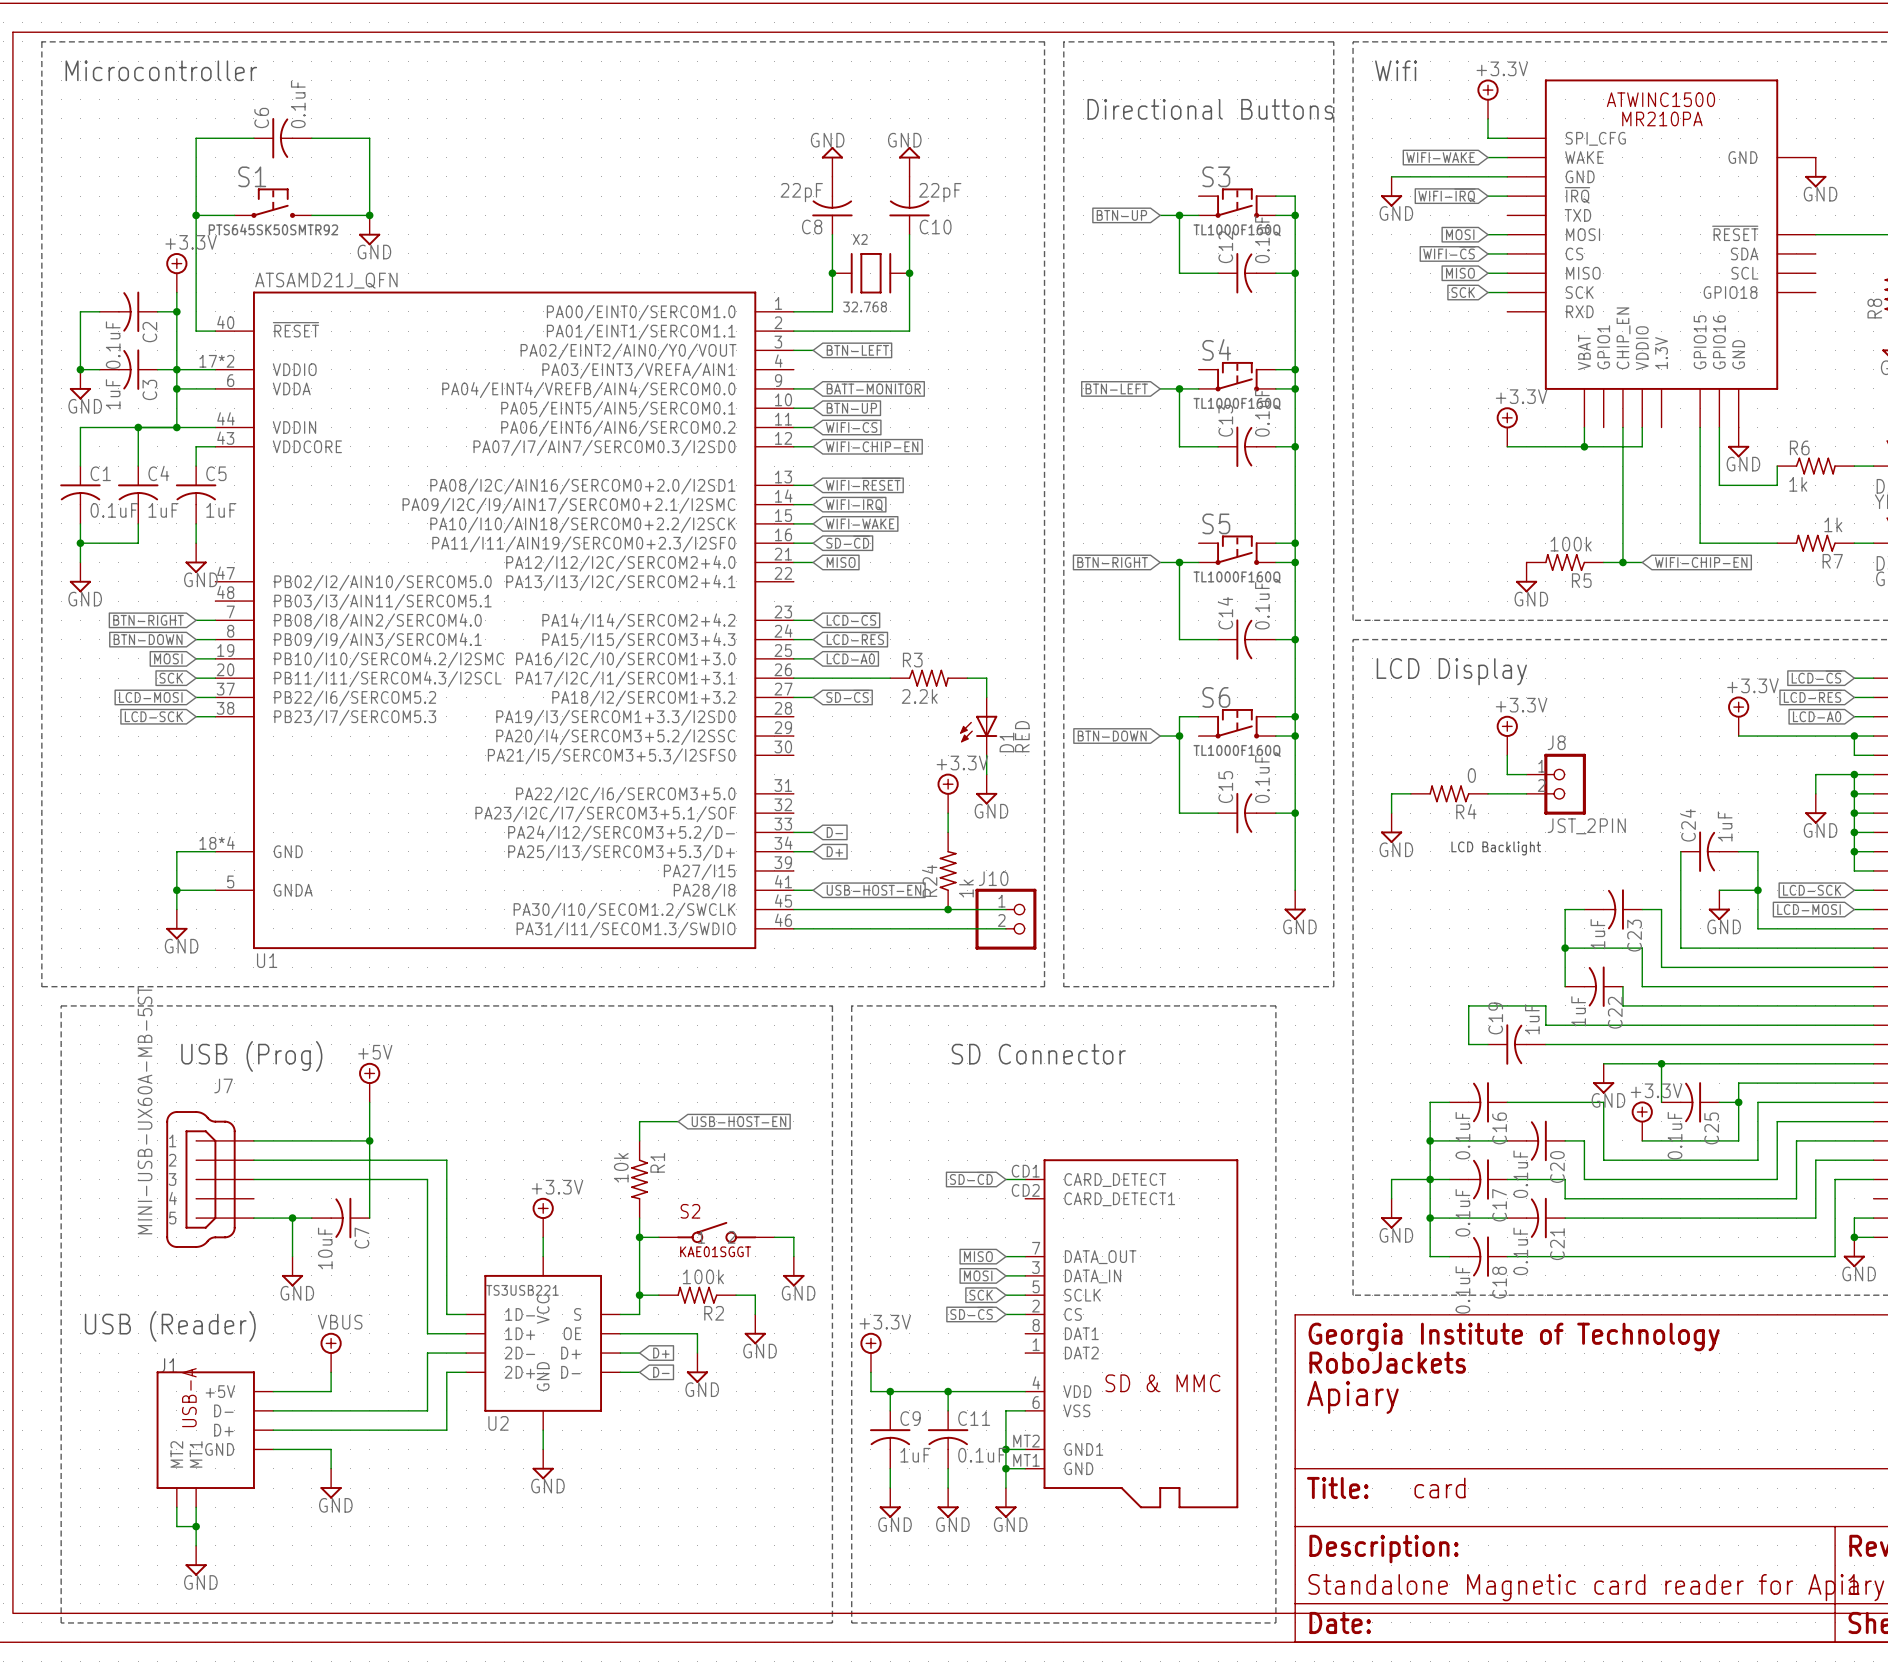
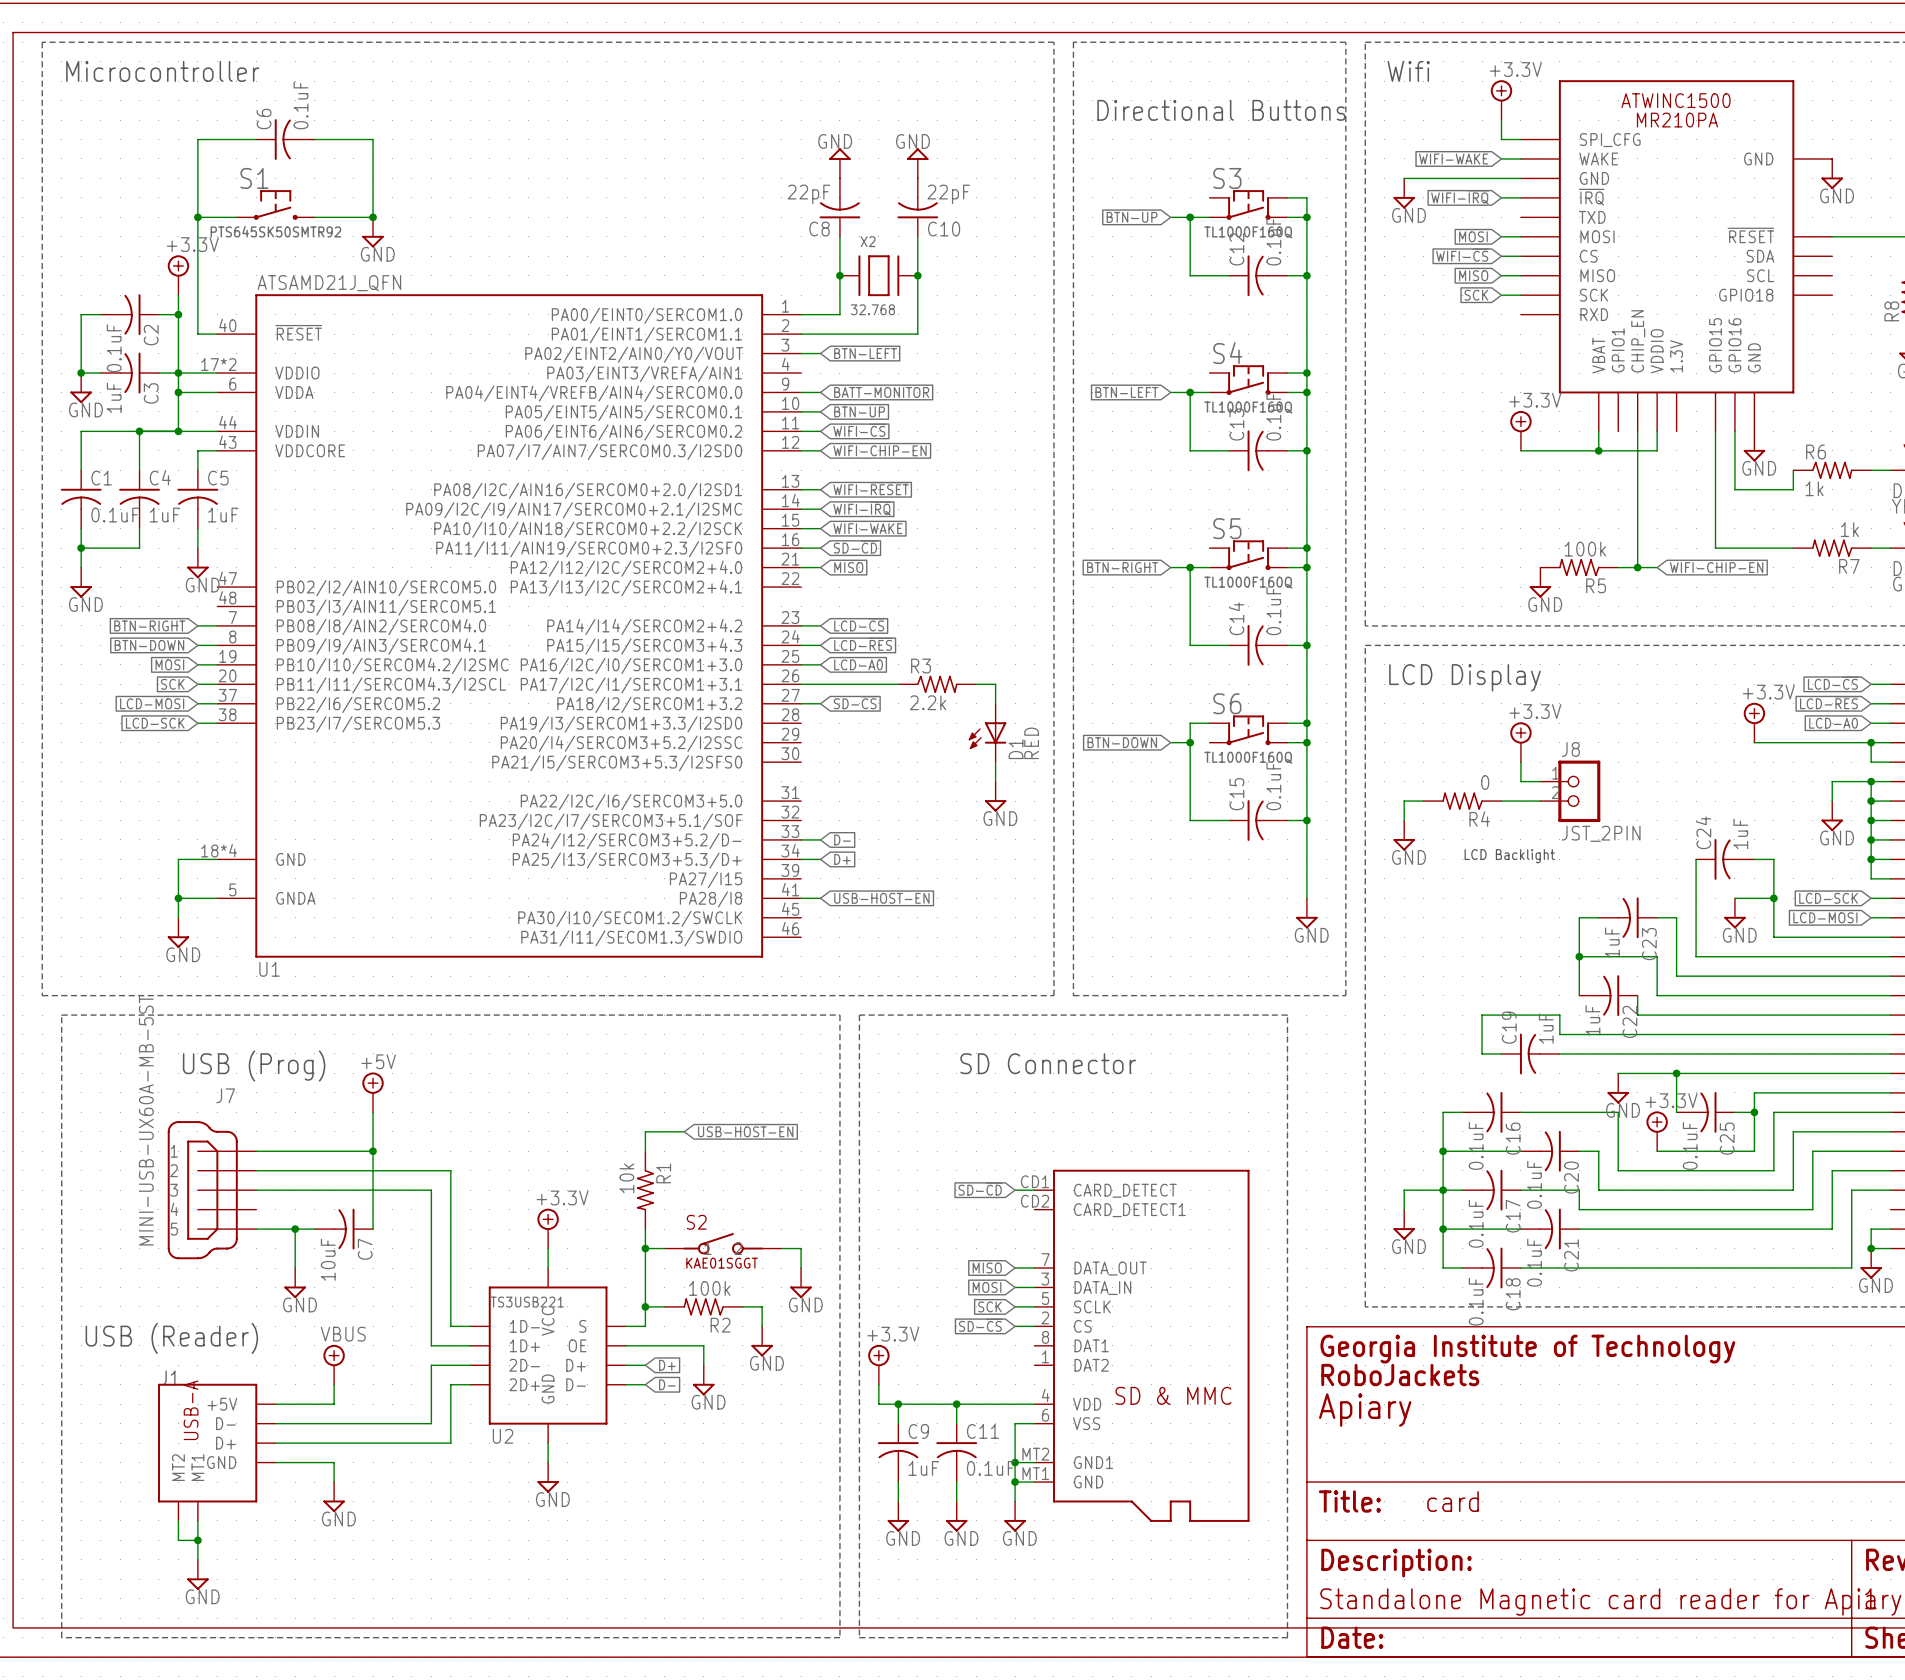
power symbol: +3.3V (948, 793) -> none
wire: (948, 813) (948, 832) -> none
R24: 1k (948, 870) -> none
wire: (793, 909) (1005, 909) -> none
junction: (948, 909) -> none
J10: (1005, 919) -> none
wire: (793, 928) (1005, 928) -> none

